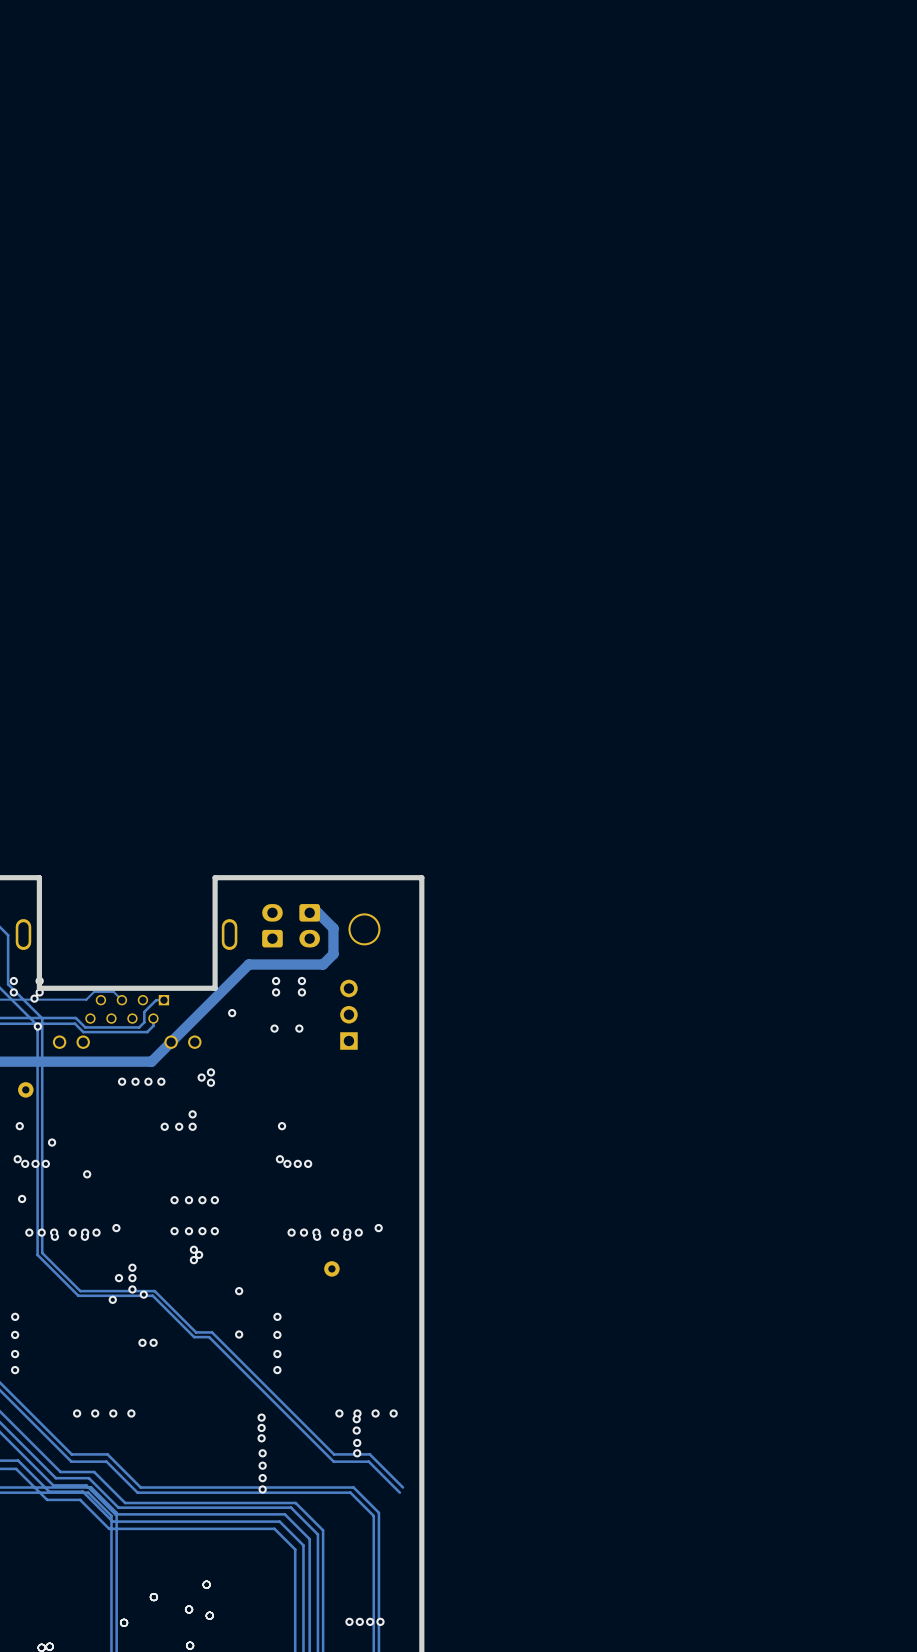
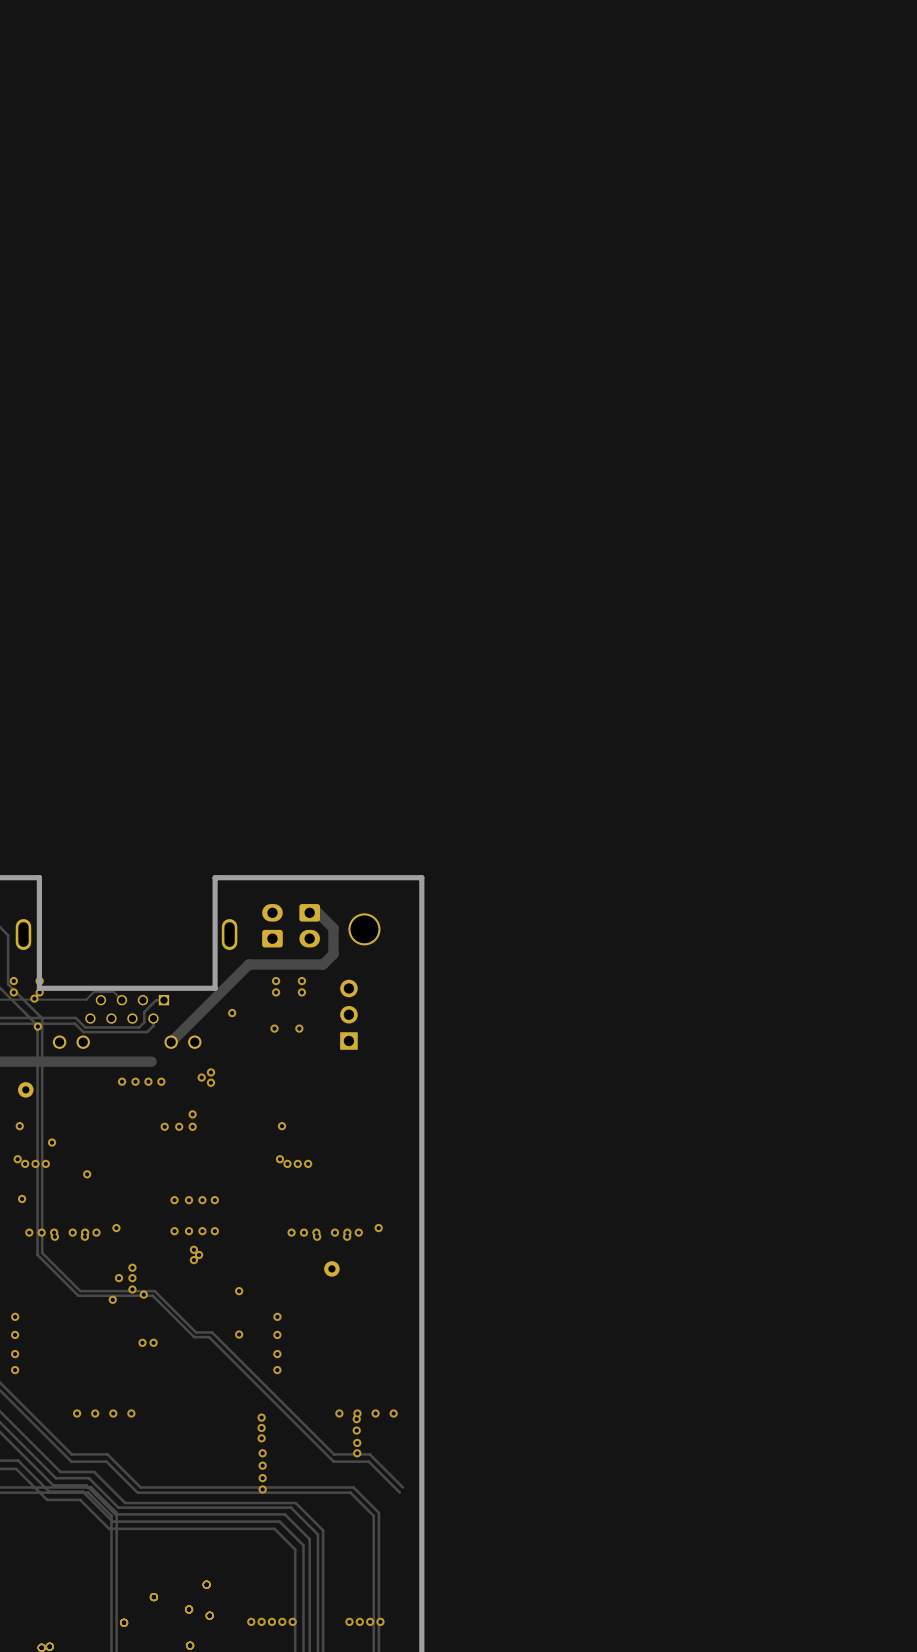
track: (171, 1042) (151, 1061) -> none
via: none -> (251, 1621)
via: none -> (261, 1621)
via: none -> (271, 1621)
via: none -> (282, 1621)
via: none -> (292, 1621)

